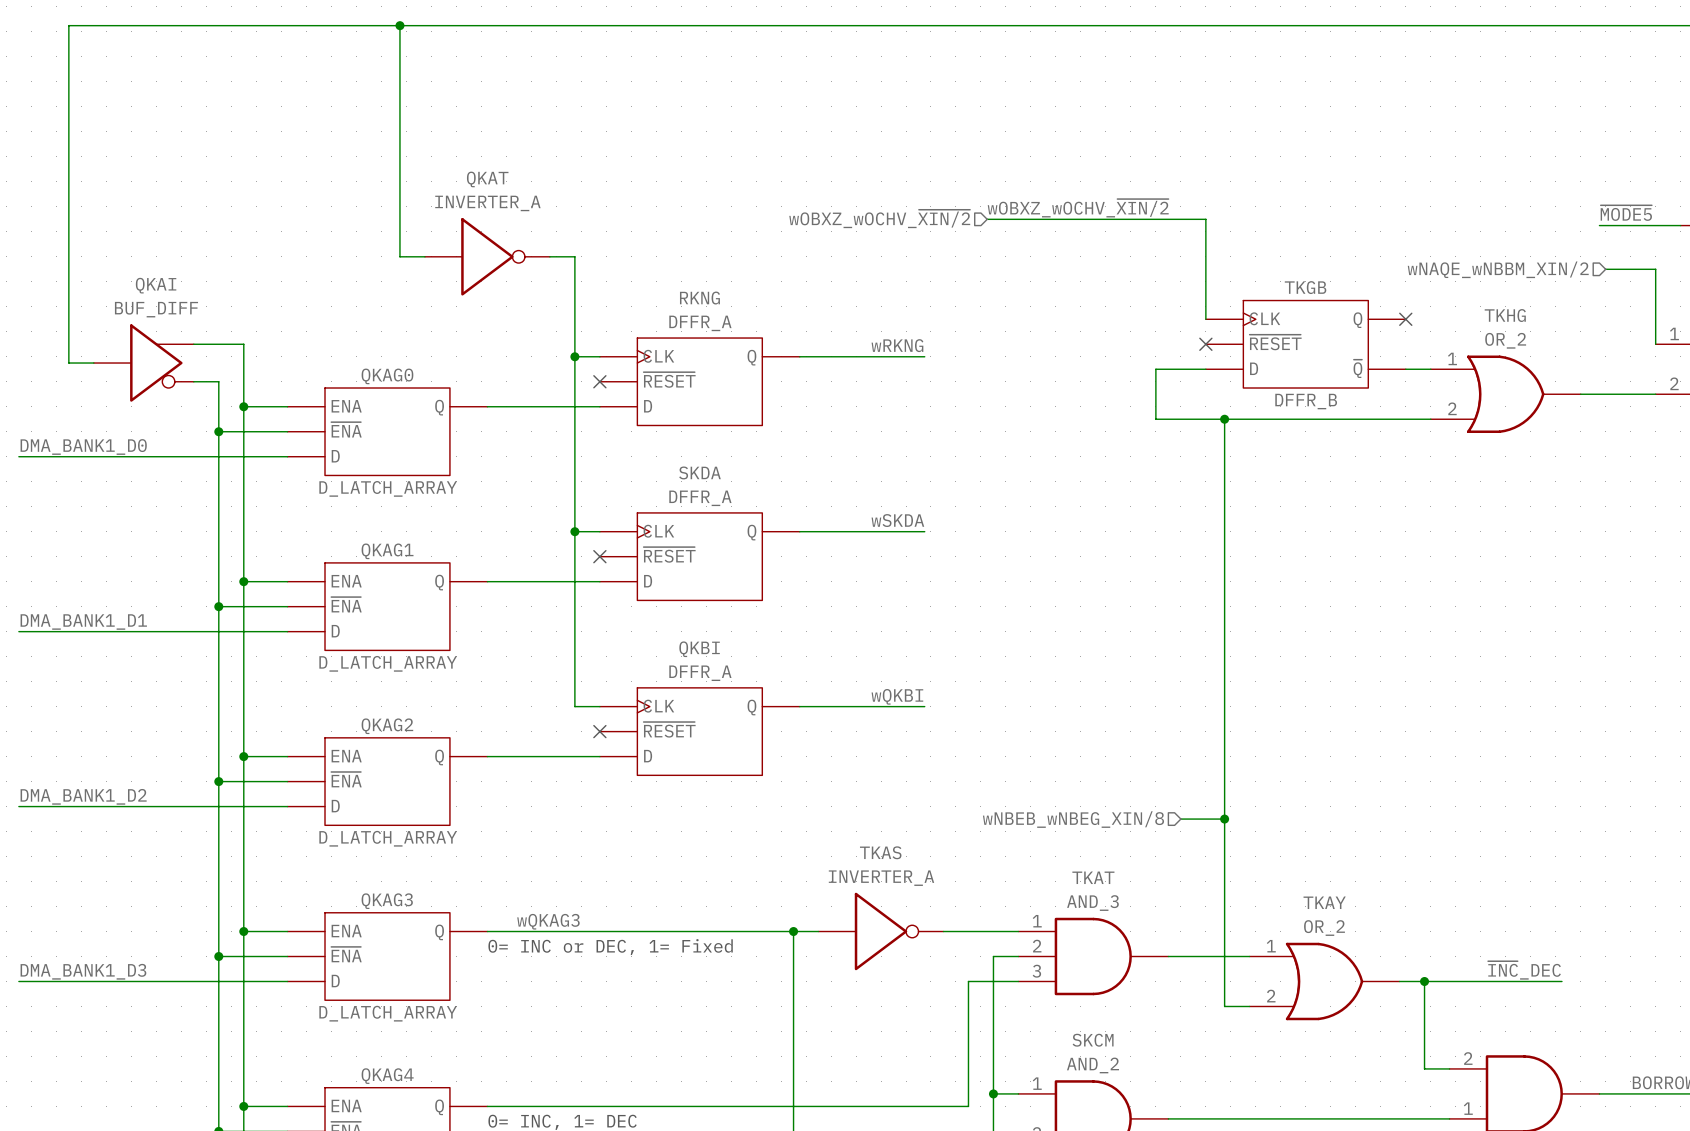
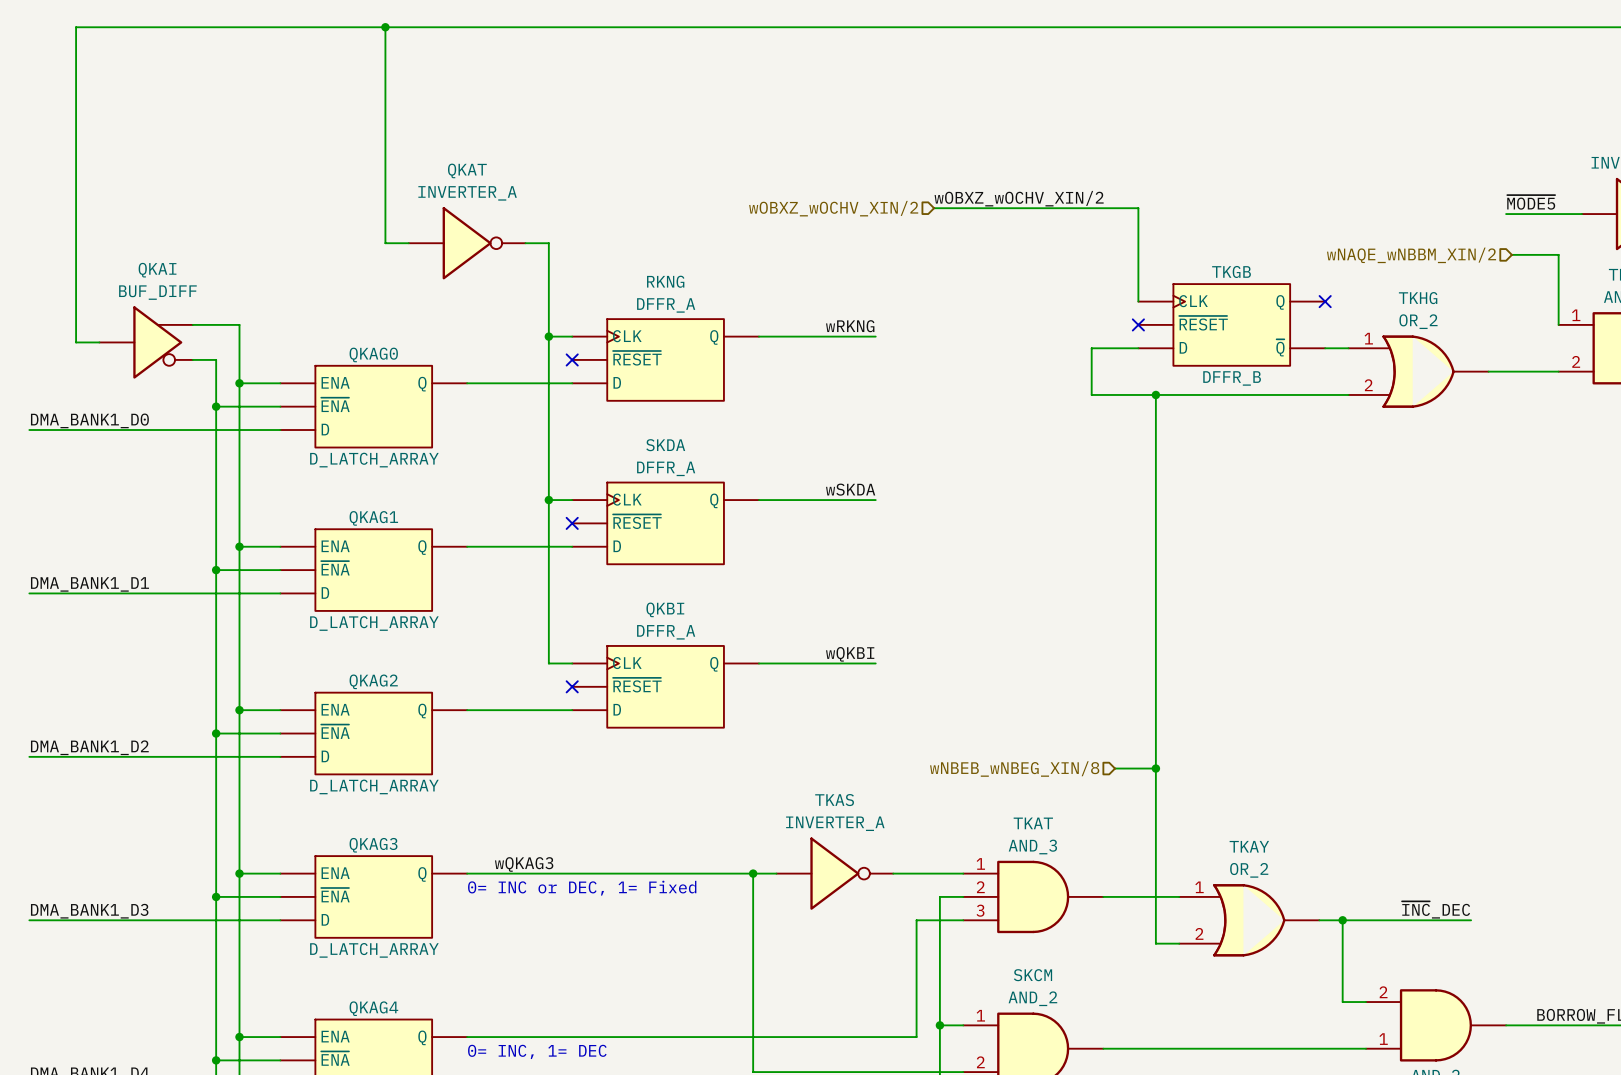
label: wOBXZ_wOCHV_~{XIN/2} (1078, 208) -> wOBXZ_wOCHV_XIN/2 (1019, 198)
hierarchical label: wOBXZ_wOCHV_~{XIN/2} (879, 218) -> wOBXZ_wOCHV_XIN/2 (833, 208)

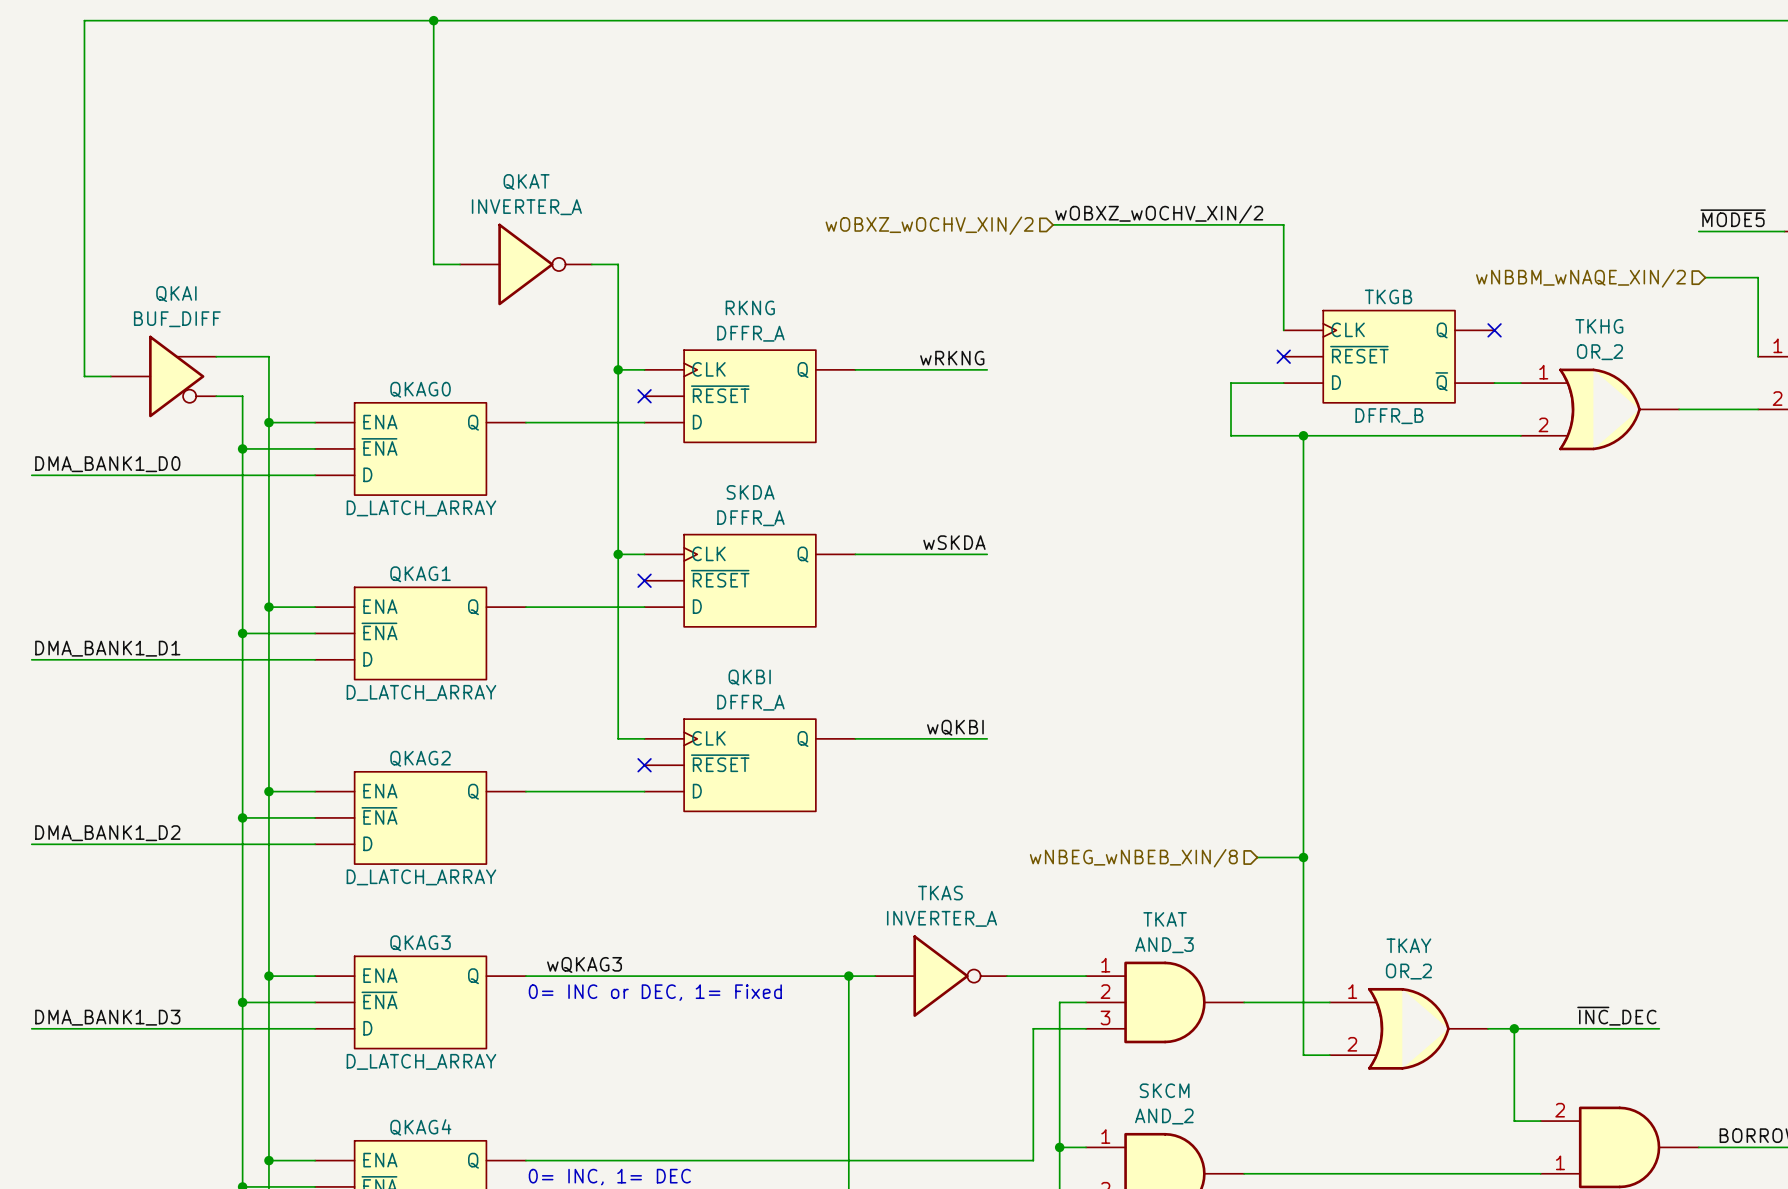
hierarchical label: wNAQE_wNBBM_XIN/2 (1411, 255) -> wNBBM_wNAQE_XIN/2 (1580, 278)
hierarchical label: wNBEB_wNBEG_XIN/8 (1014, 769) -> wNBEG_wNBEB_XIN/8 (1133, 858)

